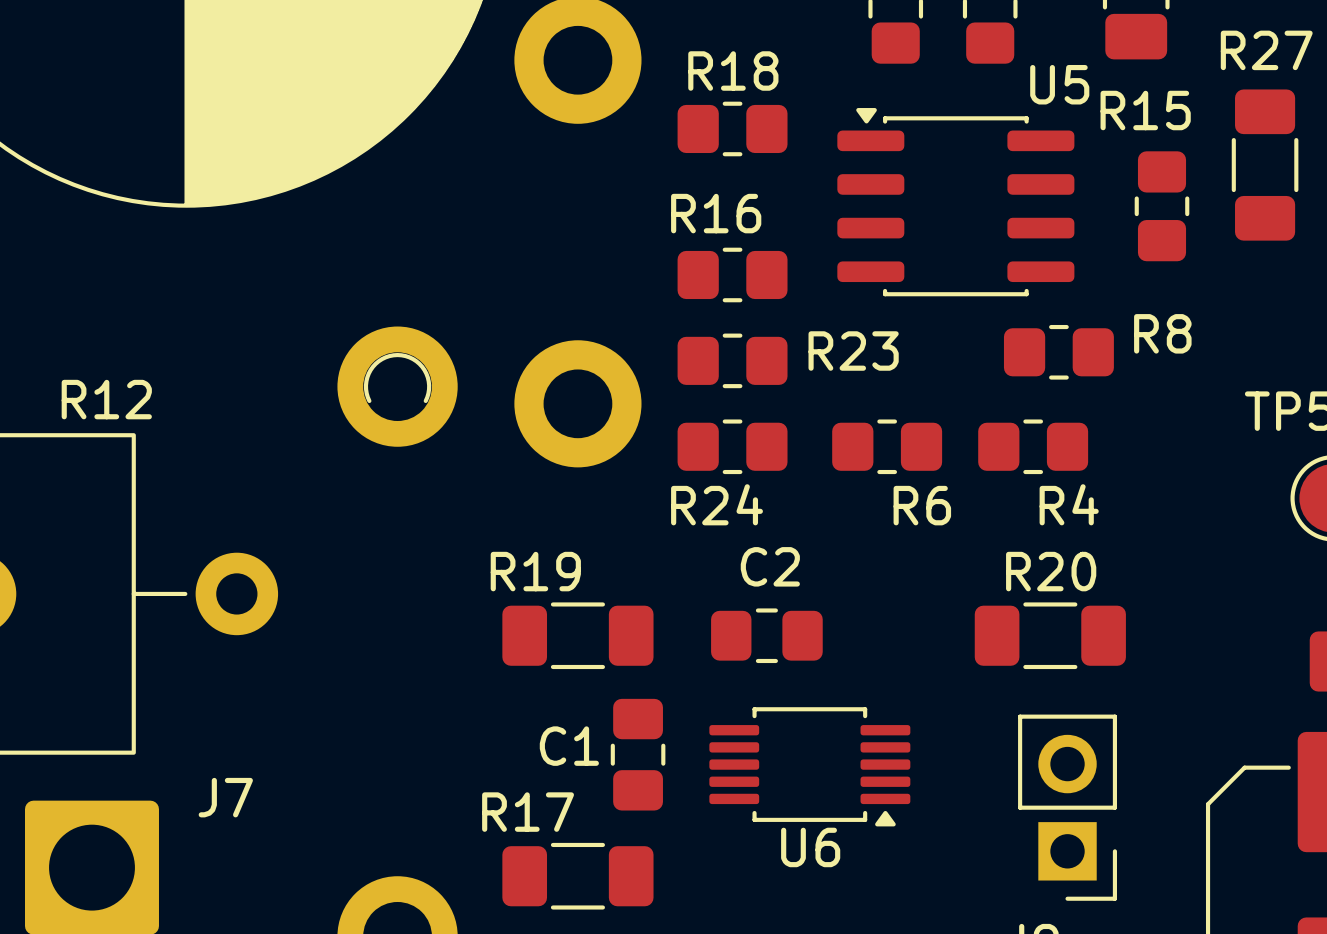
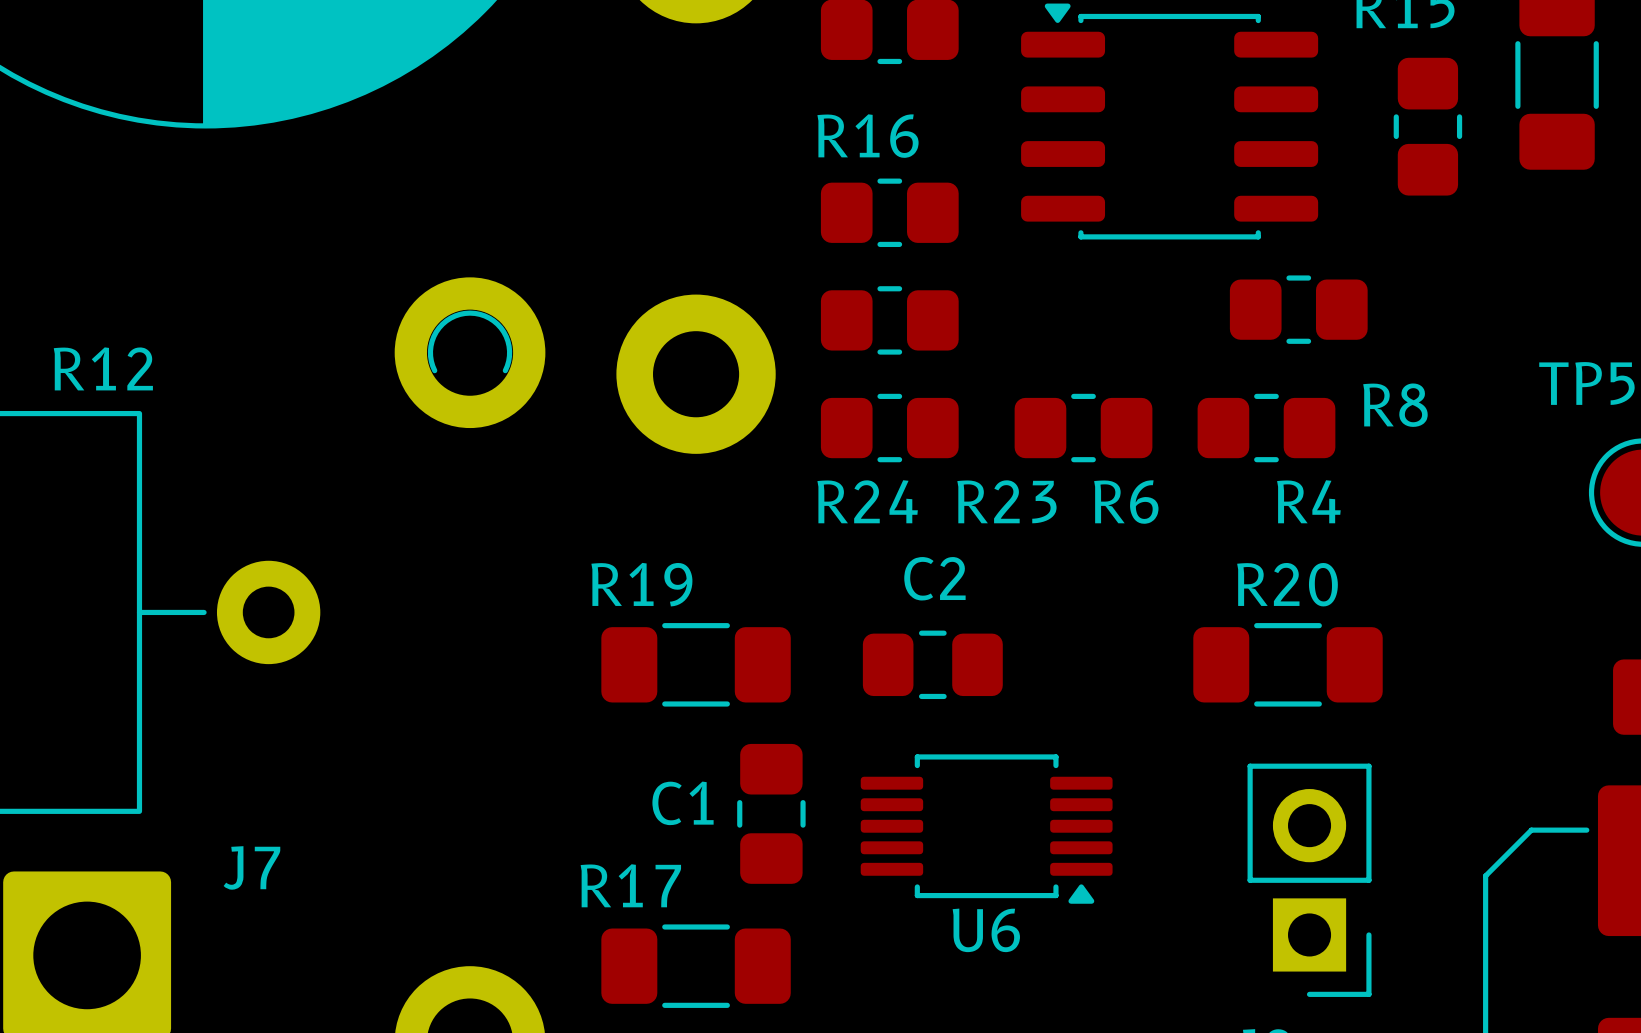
R8 name position: R8 (1162, 333) -> R8 (1395, 405)
R23 name position: R23 (853, 351) -> R23 (1006, 501)

